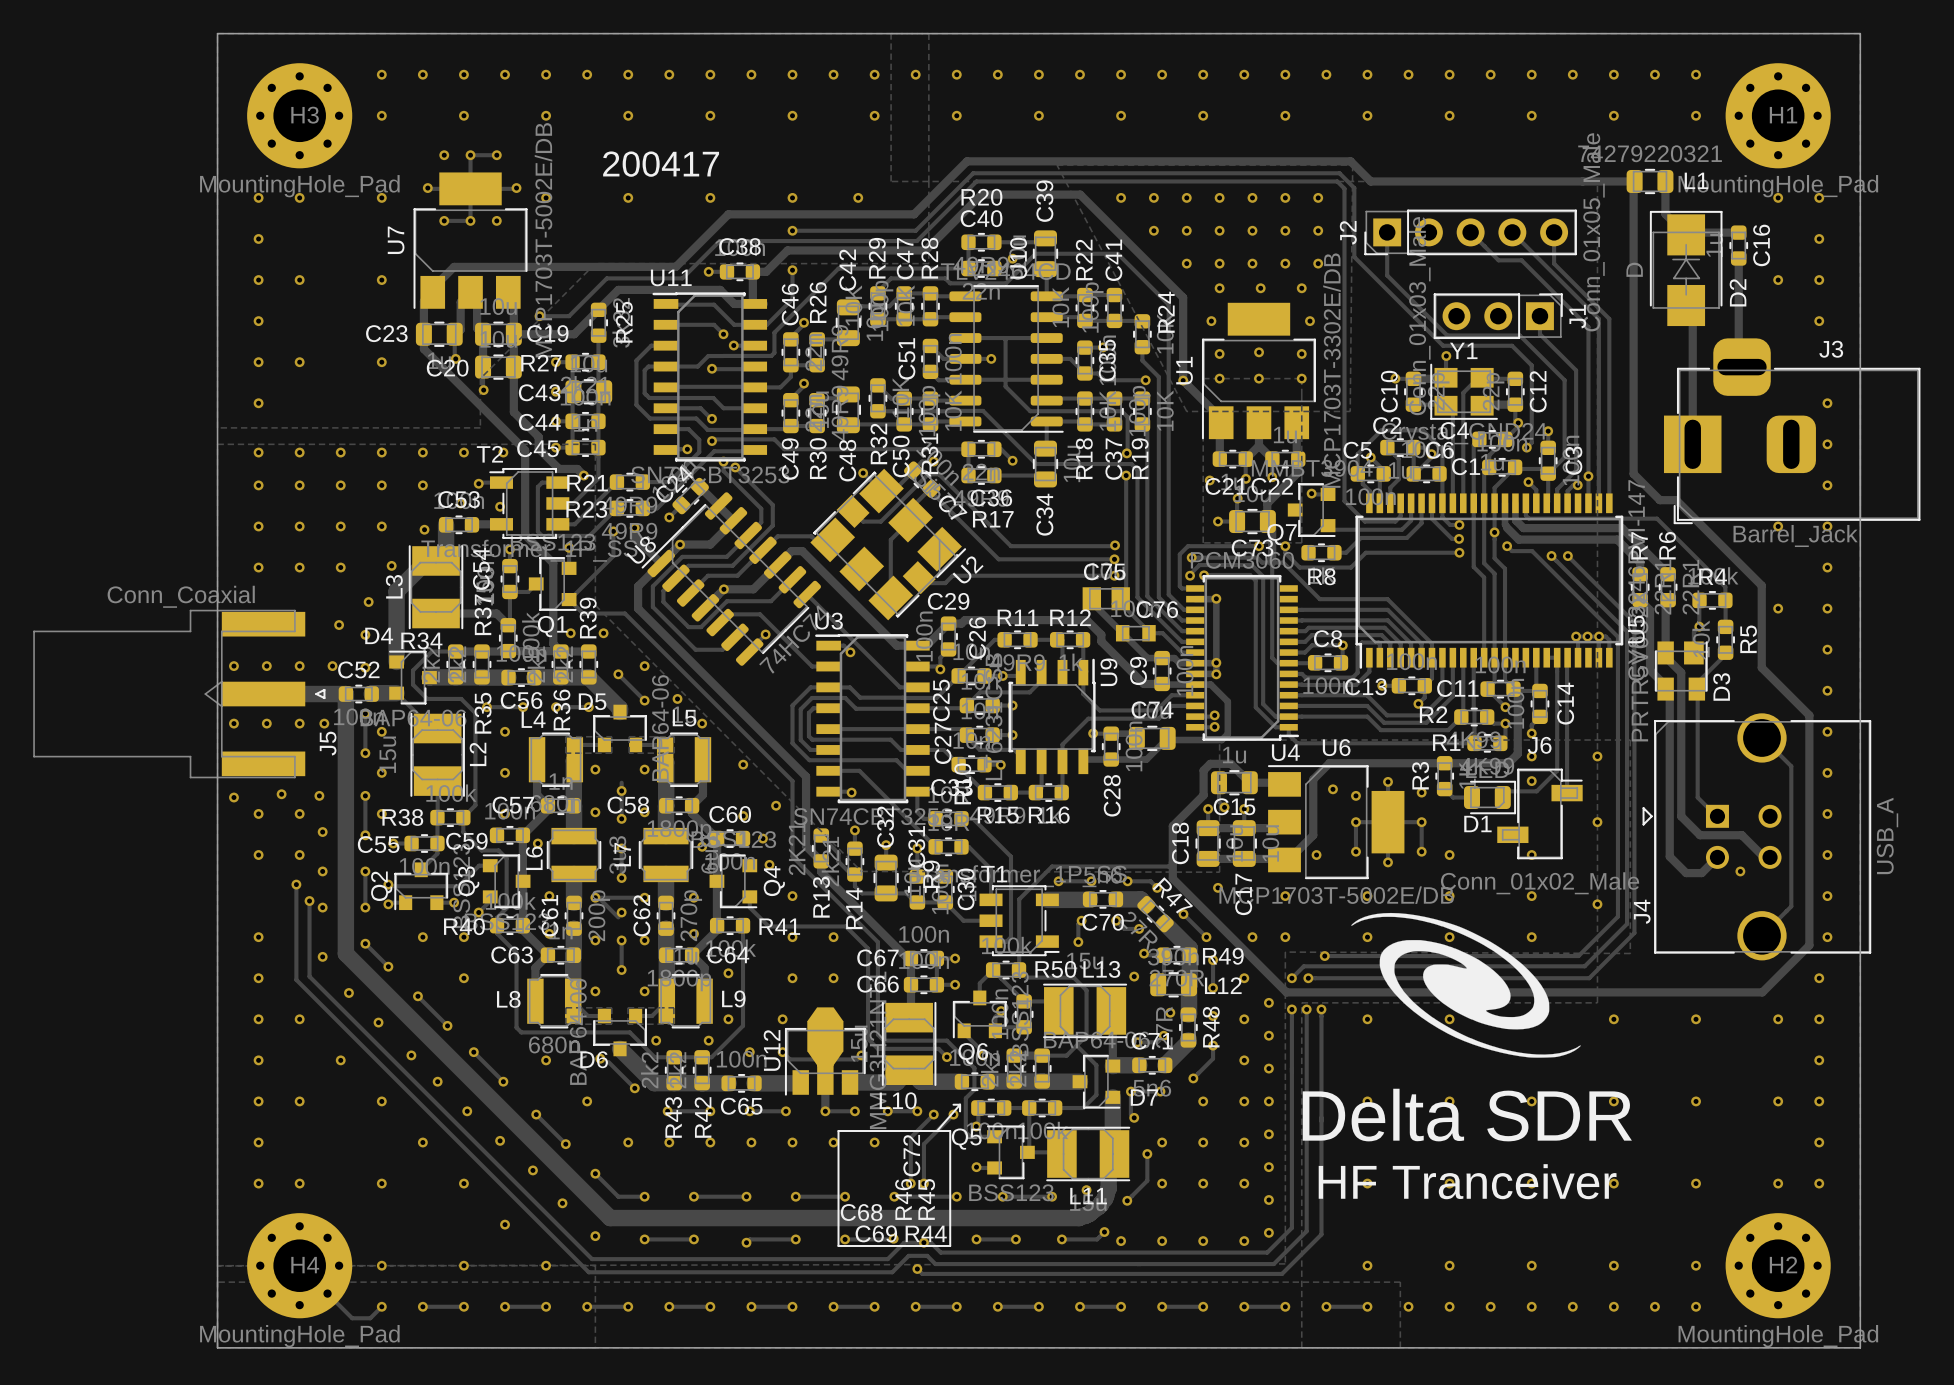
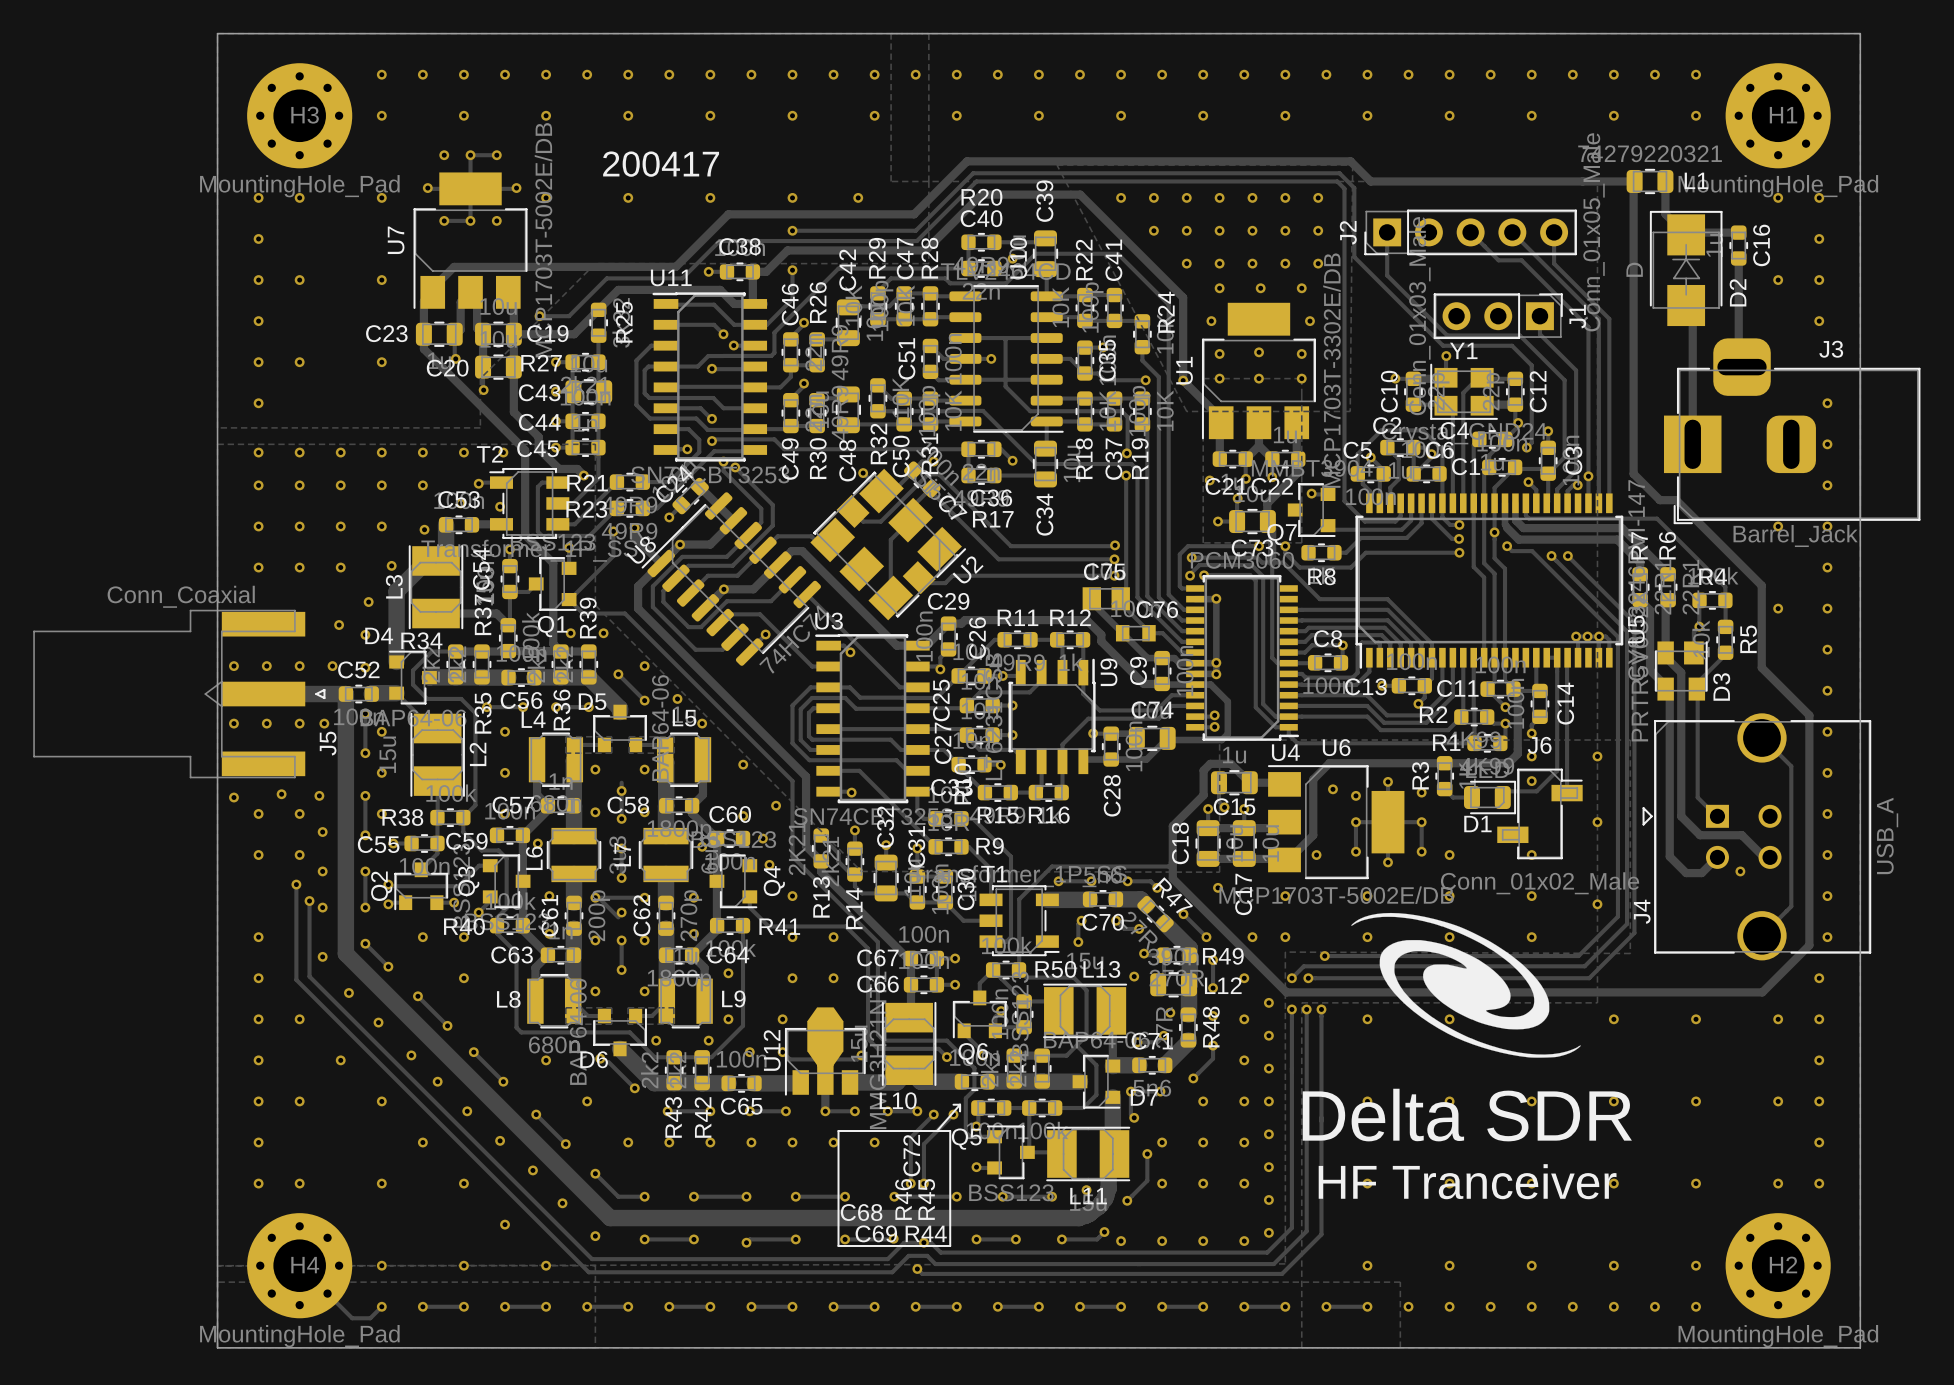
R9 name rotation: 0° (931, 874) -> 90° clockwise (990, 846)
R9 name position: R9 (931, 874) -> R9 (990, 846)

